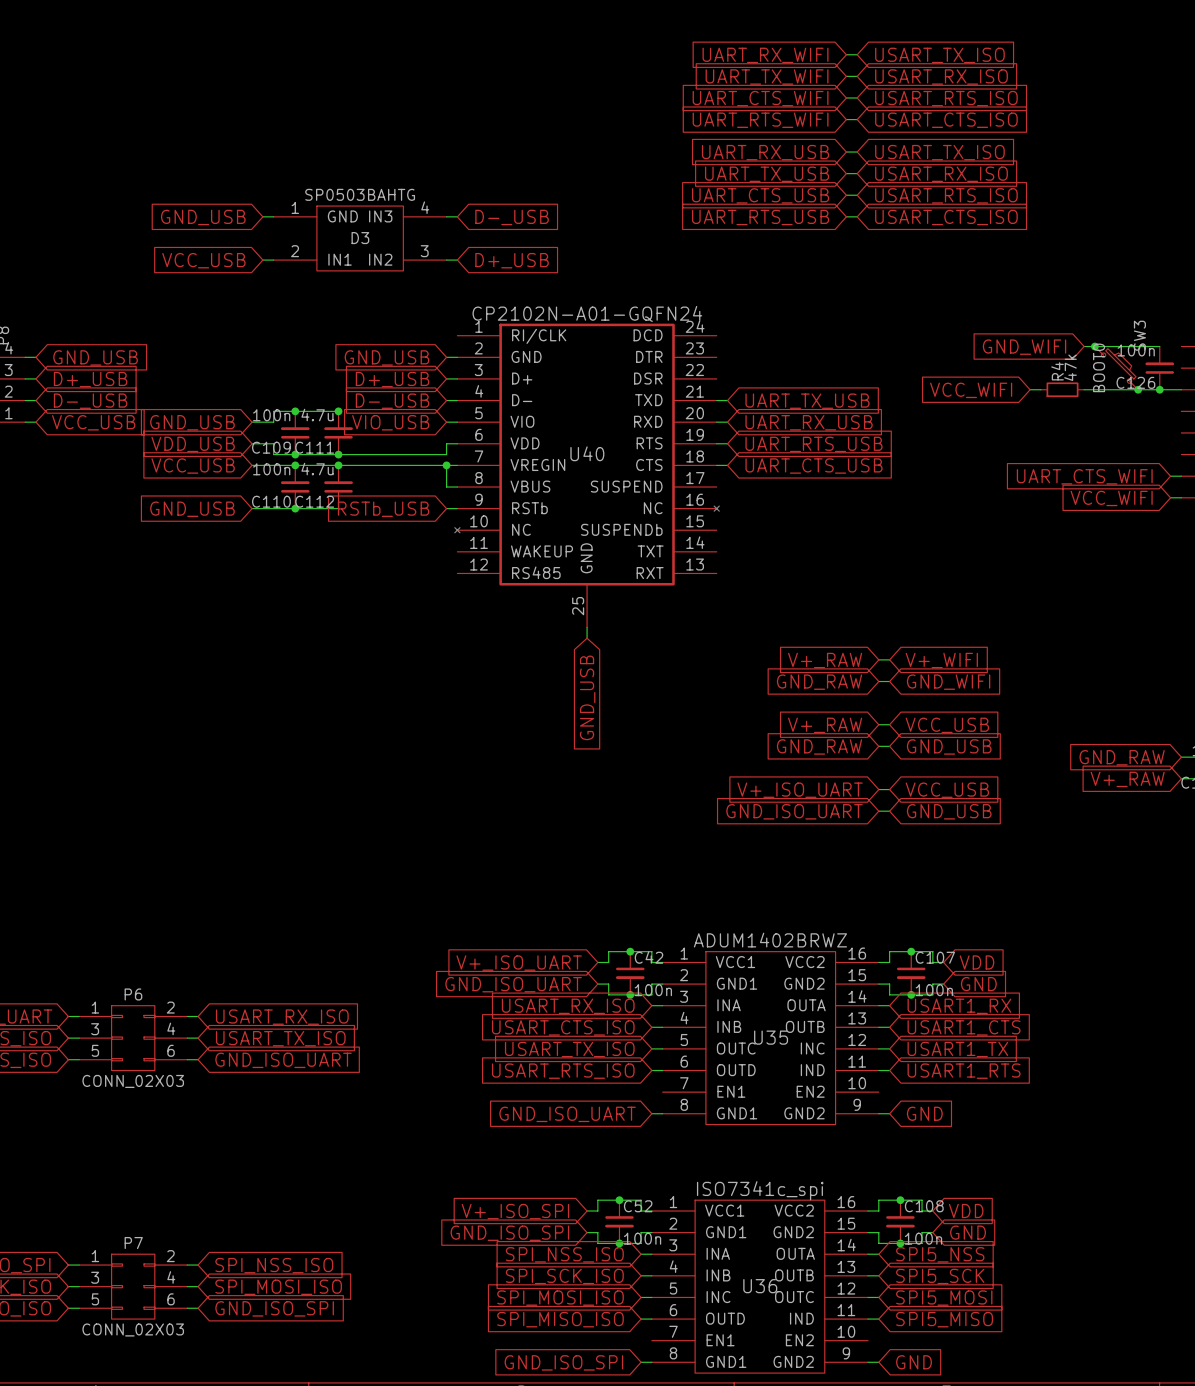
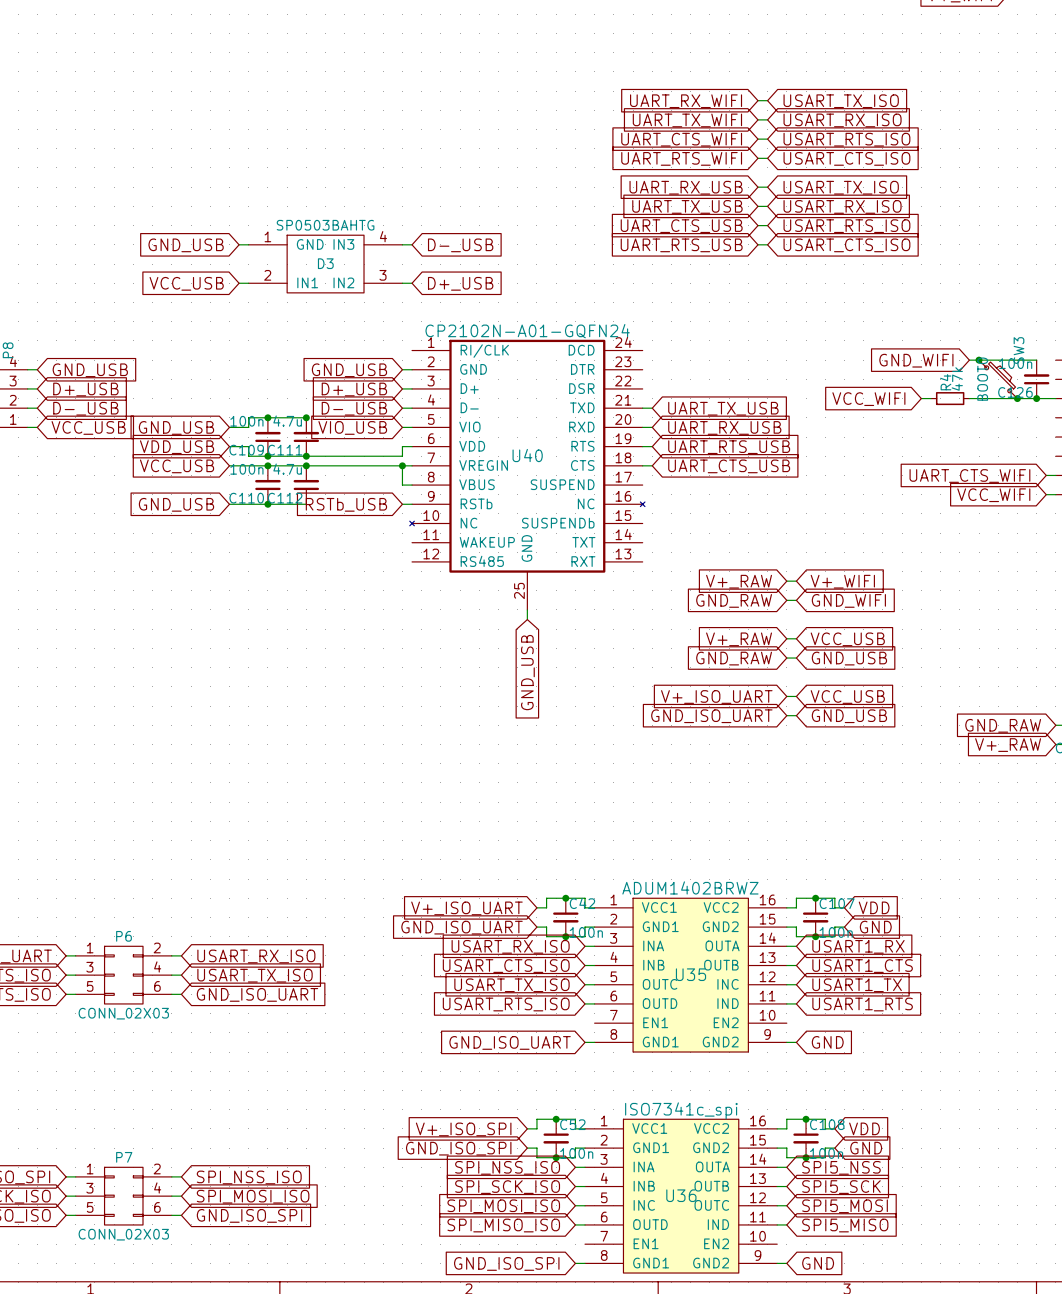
global label: none -> V+_RAW (739, 581)
global label: none -> V+_WIFI (842, 581)
global label: none -> GND_RAW (734, 600)
global label: none -> GND_WIFI (848, 600)
global label: V+_WIFI (941, 660) -> VCC_USB (847, 639)
global label: GND_WIFI (948, 682) -> GND_USB (849, 658)
global label: V+_RAW (825, 725) -> V+_ISO_UART (716, 697)
global label: GND_RAW (819, 746) -> GND_ISO_UART (711, 716)
wire: (878, 789) (889, 789) -> (786, 581) (796, 581)
global label: V+_ISO_UART (800, 790) -> none
global label: VCC_USB (947, 790) -> none
global label: GND_ISO_UART (794, 811) -> none
wire: (878, 811) (889, 811) -> (786, 600) (796, 600)
global label: GND_USB (949, 811) -> none

